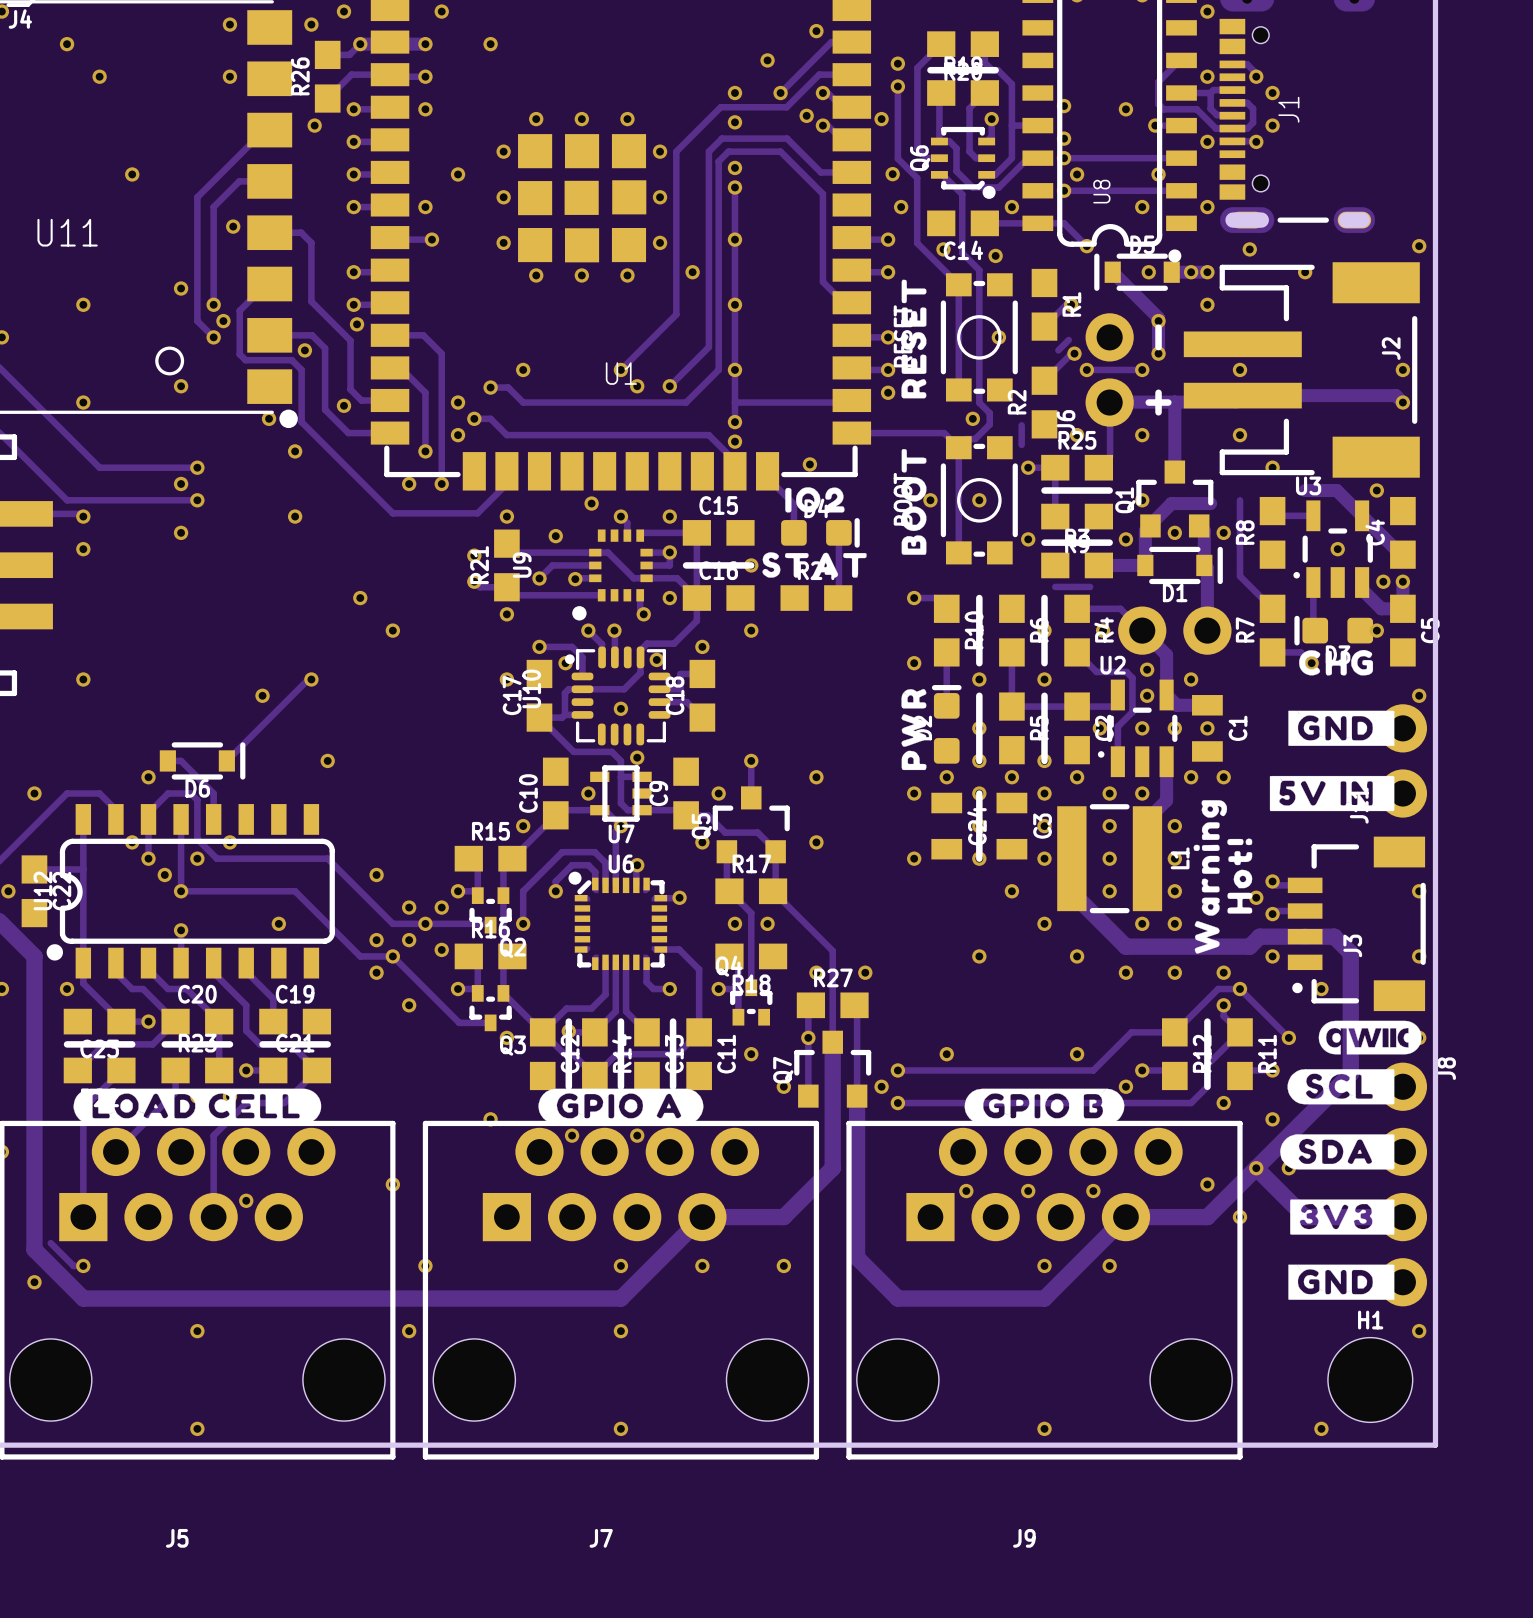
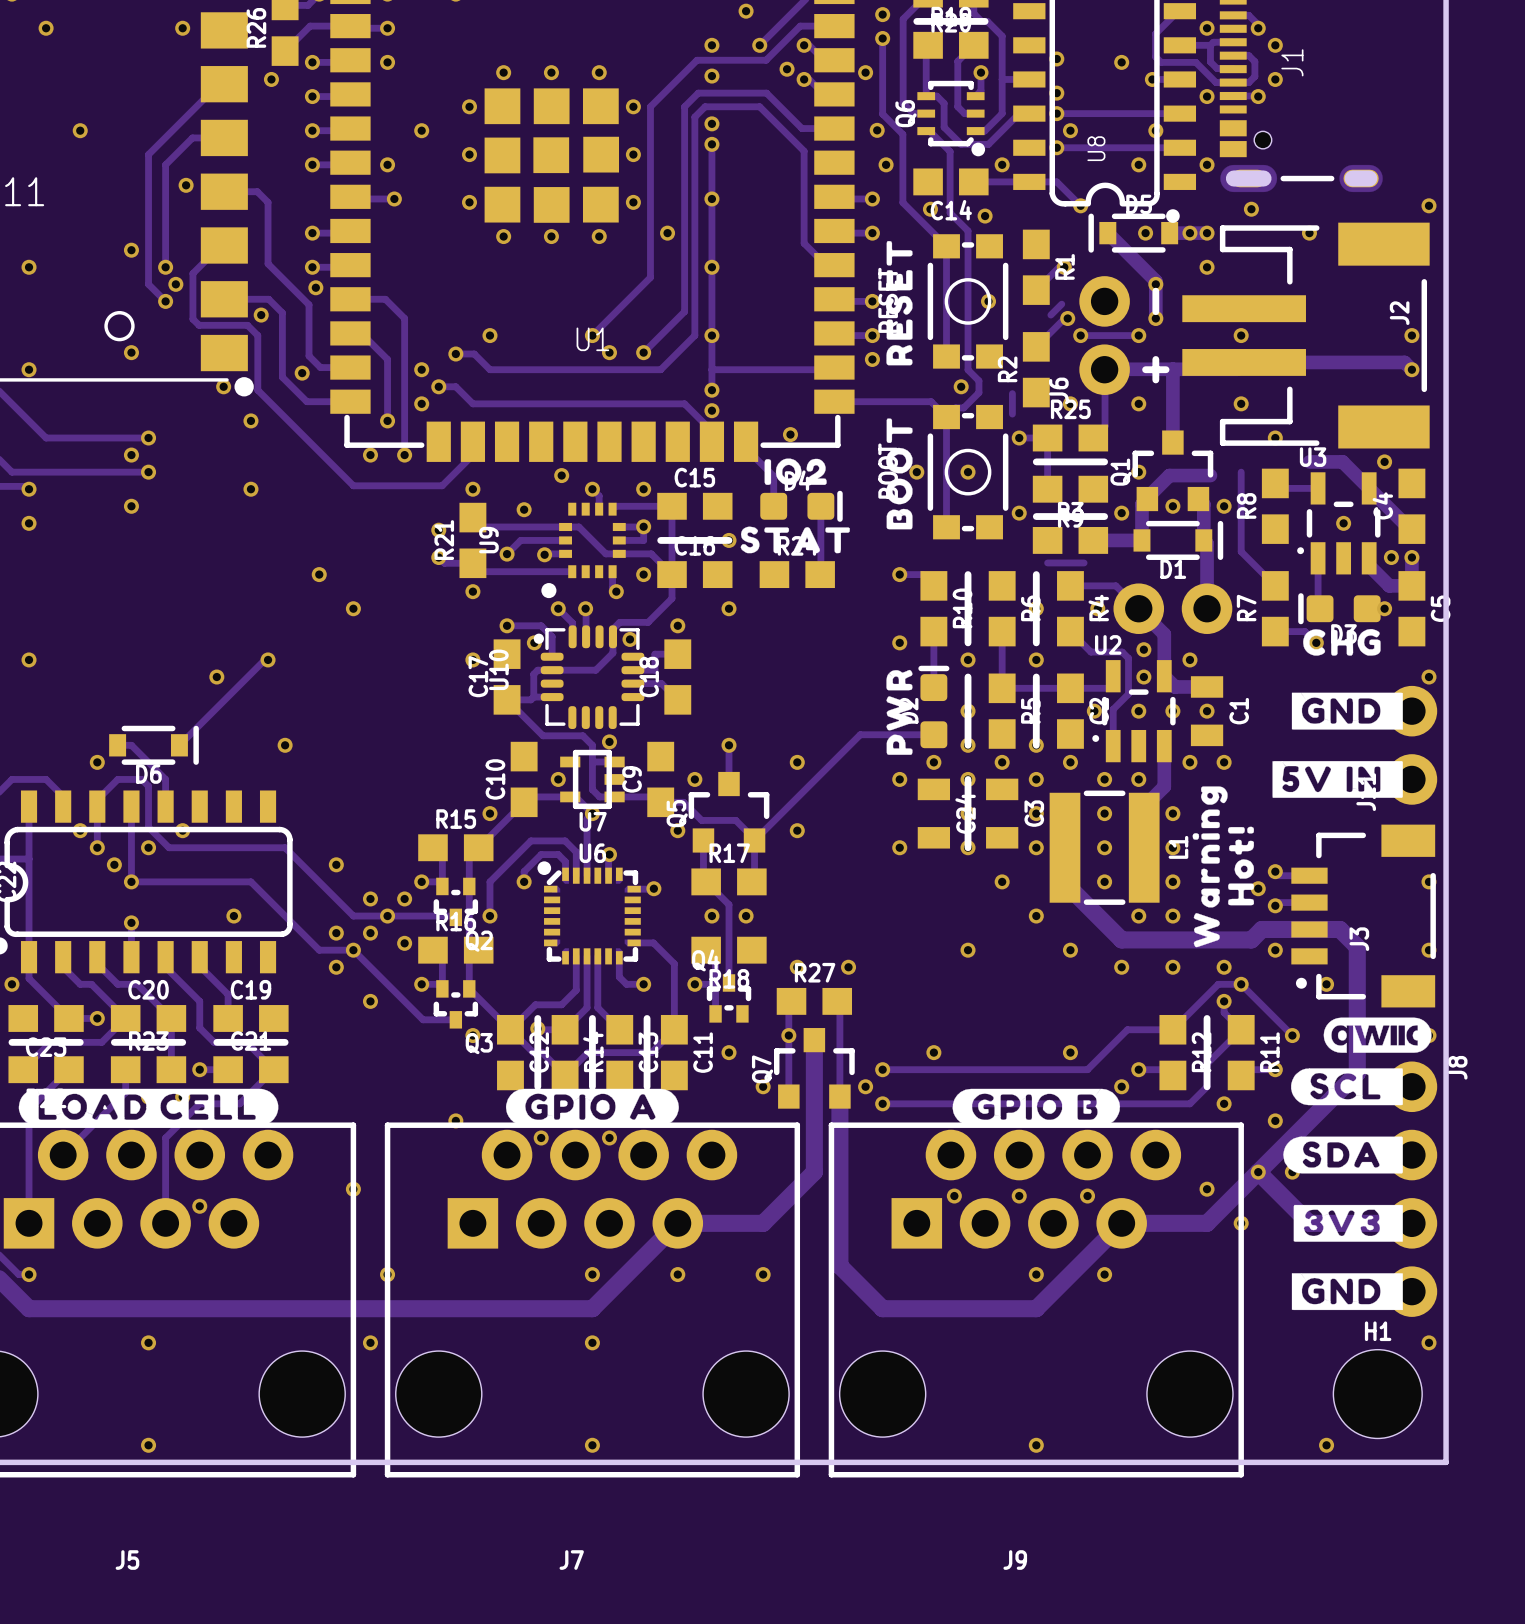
via: (620, 708) -> none
track: none -> (933, 734) (860, 734) (754, 840)
track: (773, 891) (832, 950) (832, 1042) -> none

